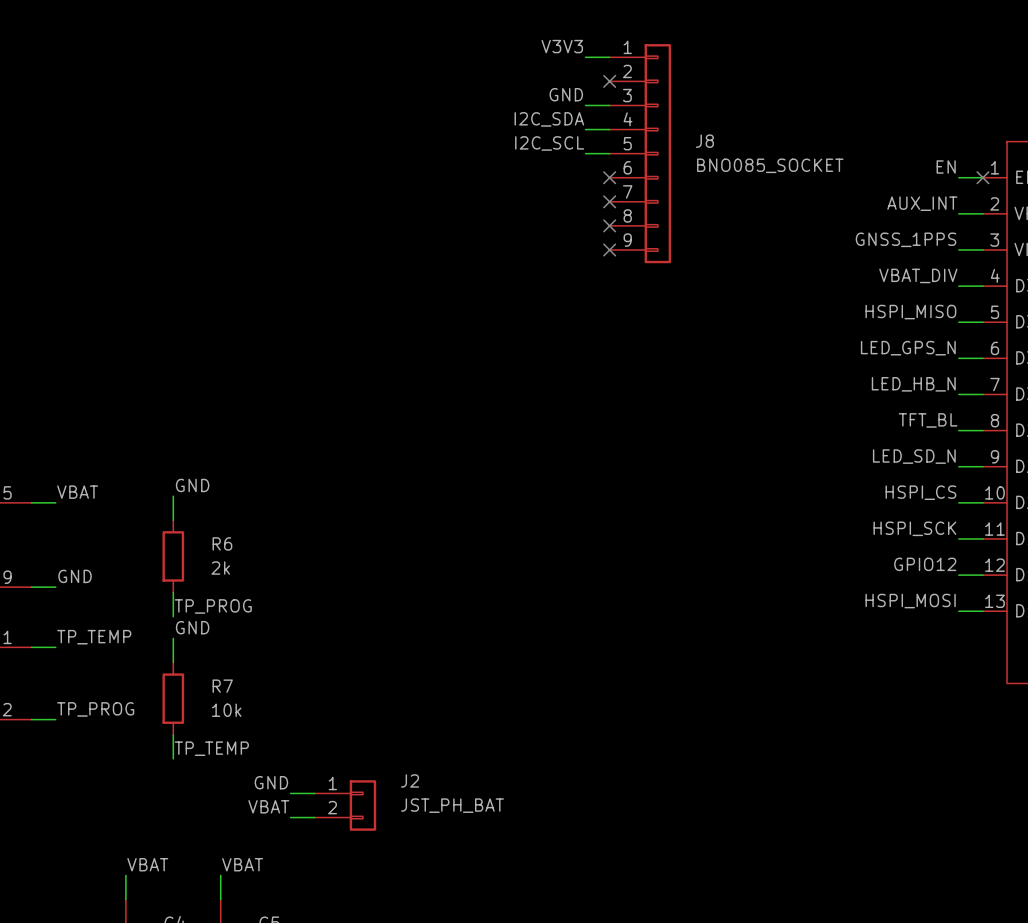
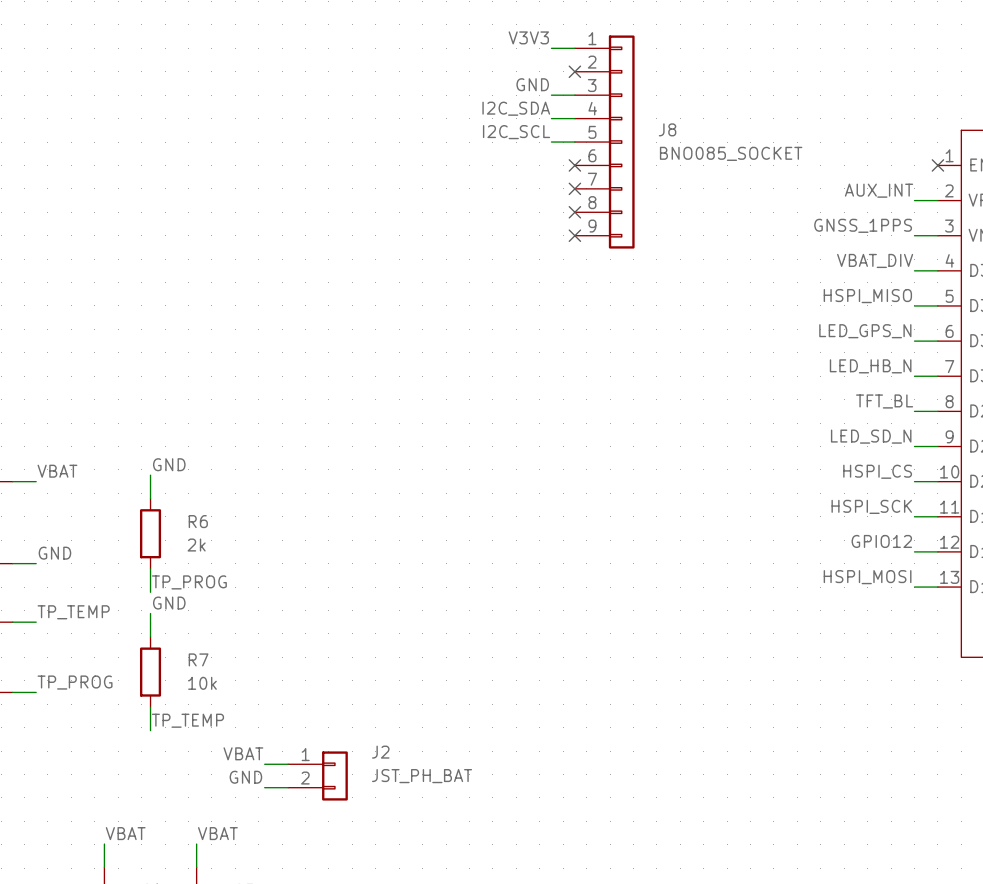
label: EN (946, 166) -> none
wire: (958, 177) (982, 177) -> none
label: GND (271, 782) -> VBAT (243, 753)
label: VBAT (268, 806) -> GND (245, 777)

